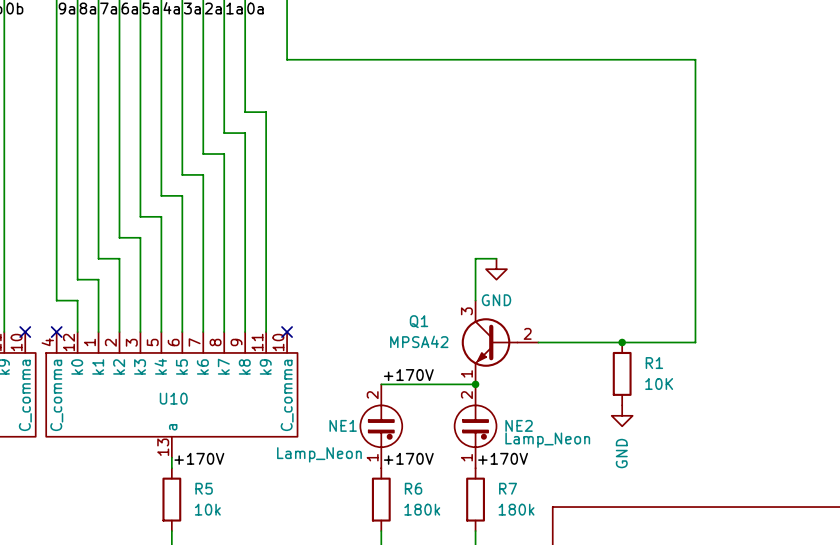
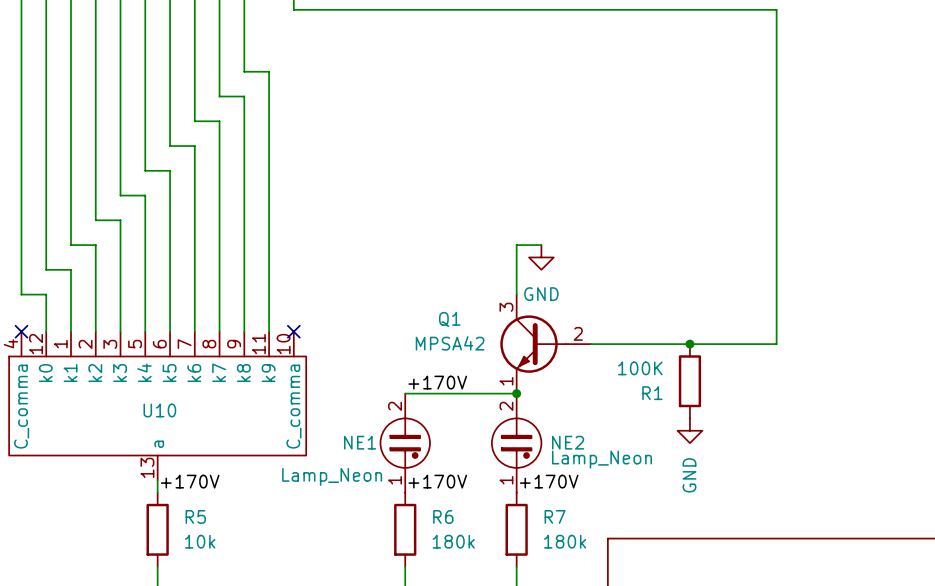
R1 name position: R1 (654, 363) -> R1 (652, 393)
R1 value: 10K (659, 384) -> 100K (640, 368)

